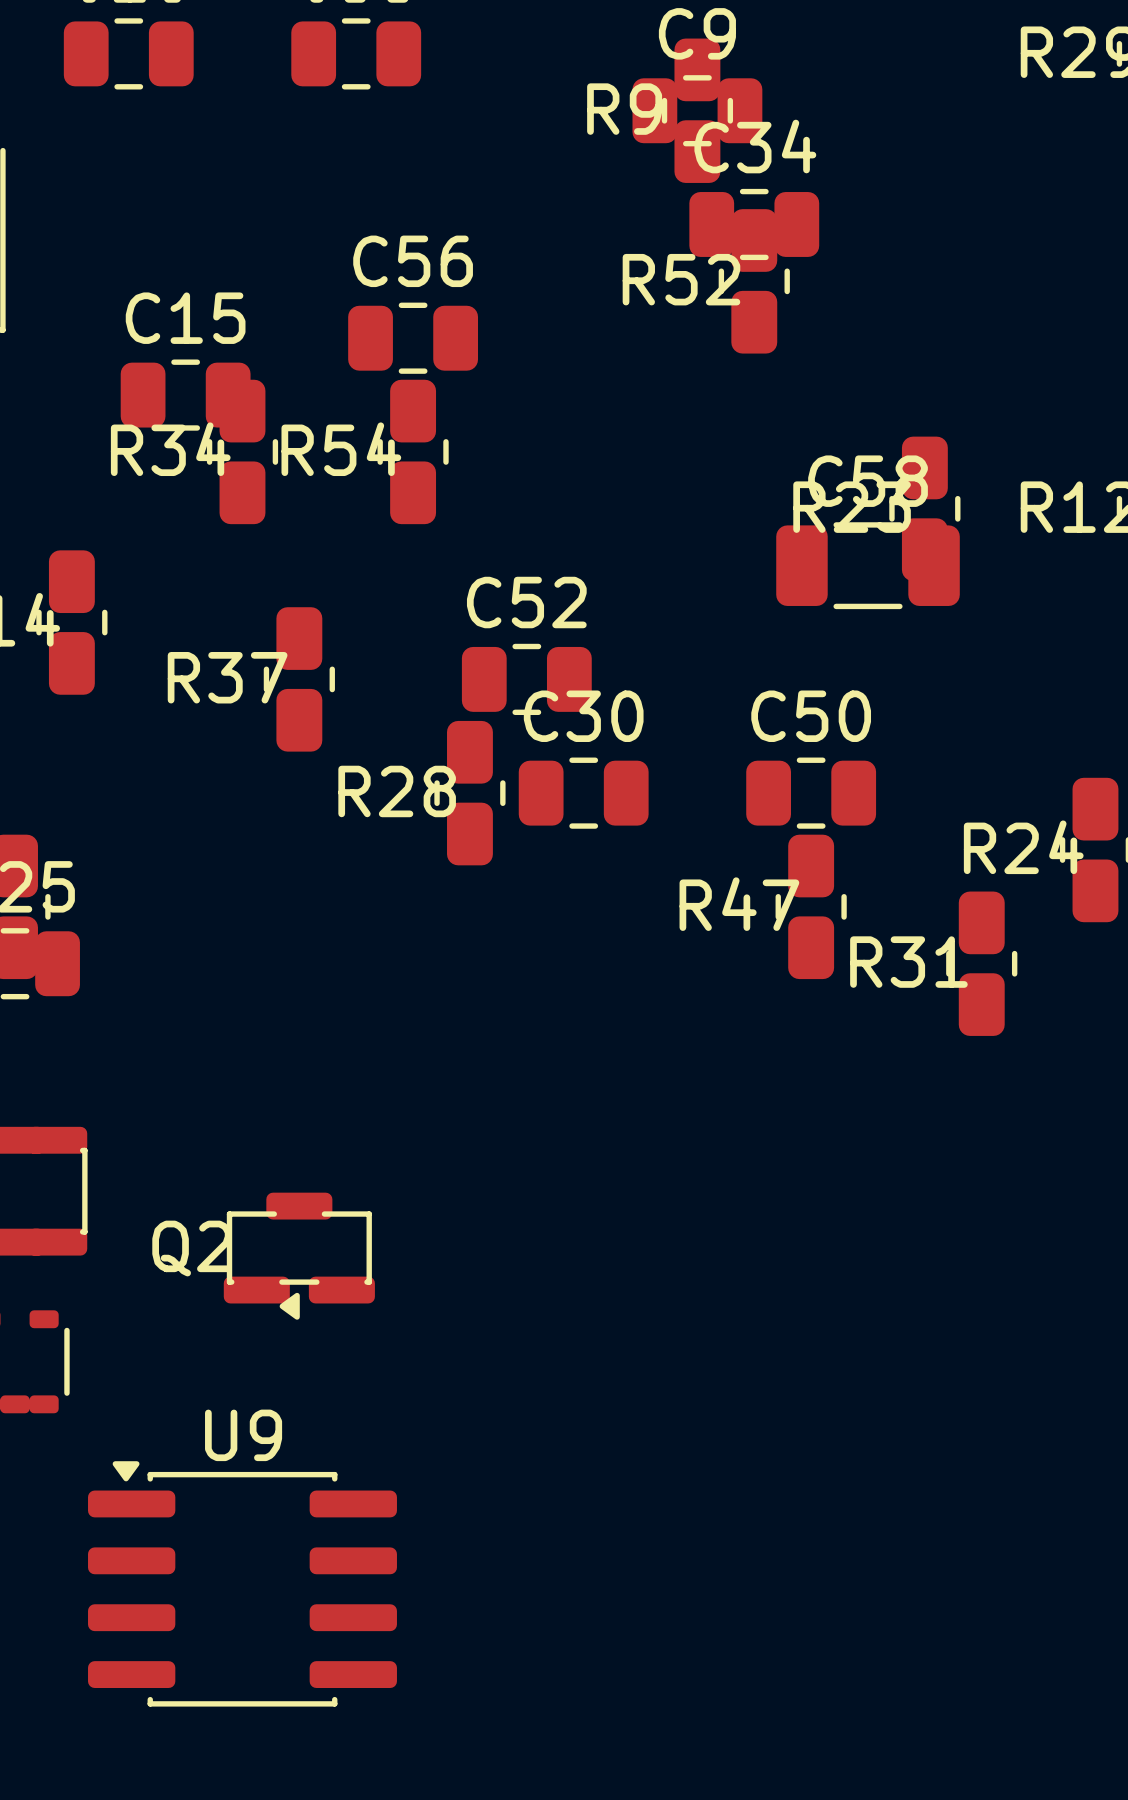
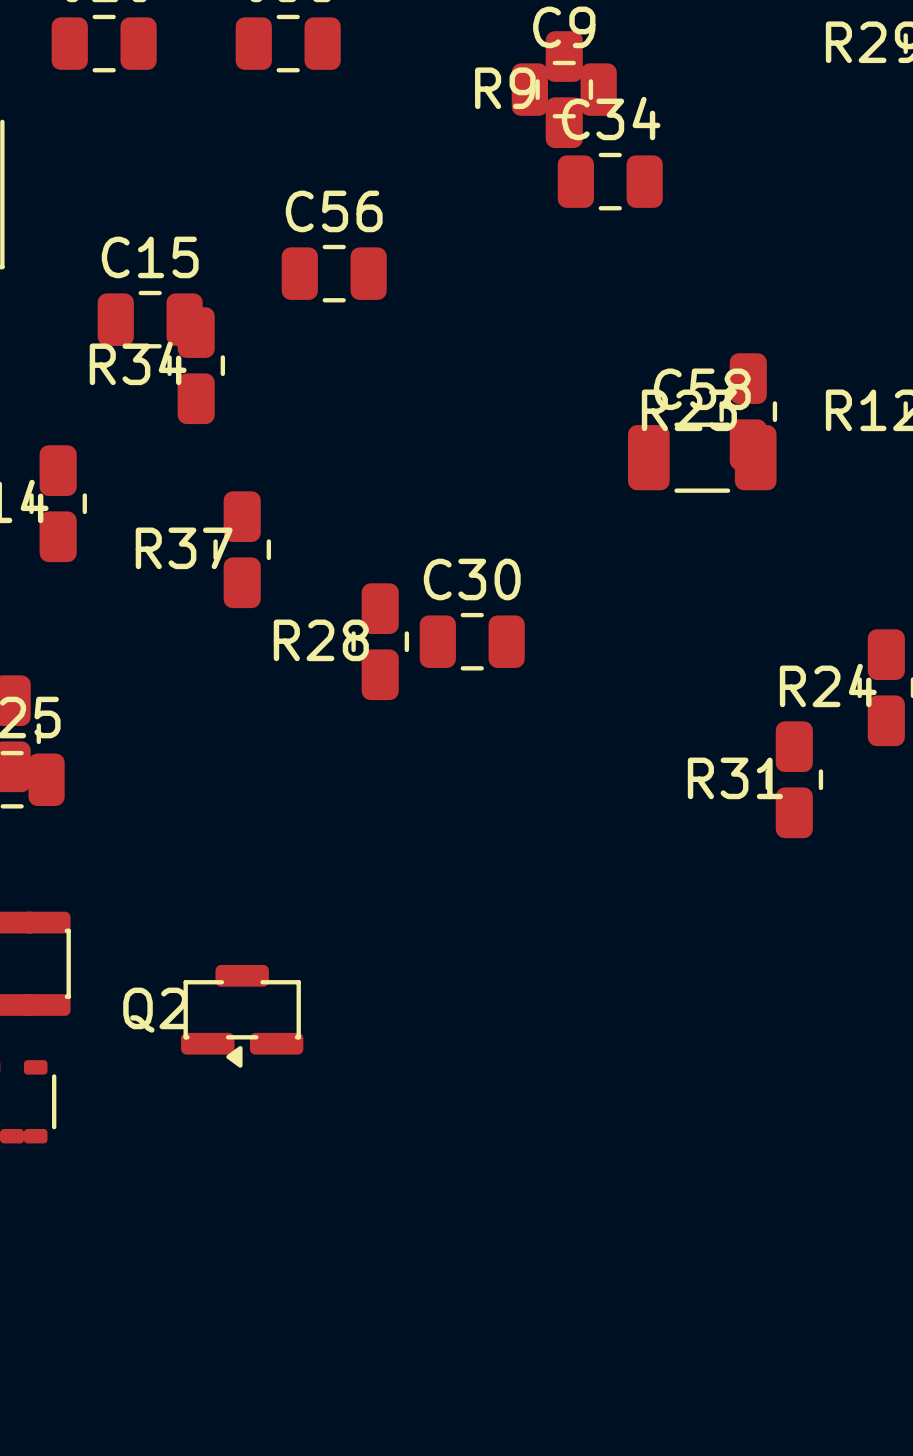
R52: (754, 281) -> none
R54: (413, 451) -> none
C52: (526, 679) -> none
C50: (811, 793) -> none
R47: (811, 906) -> none
U9: (242, 1583) -> none

